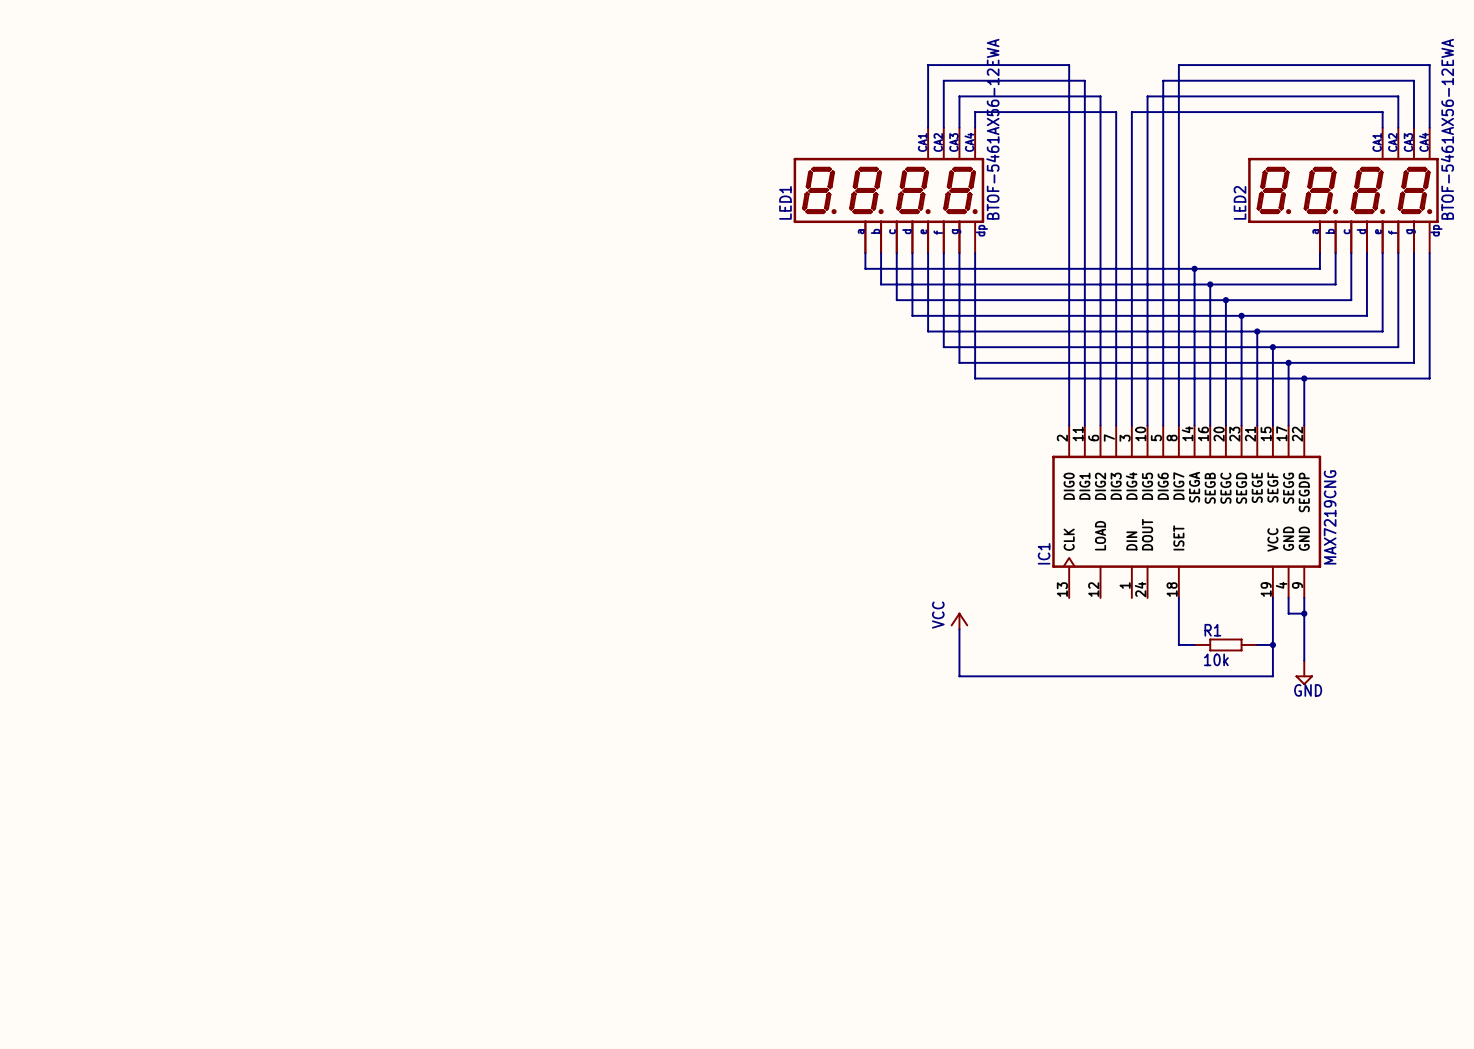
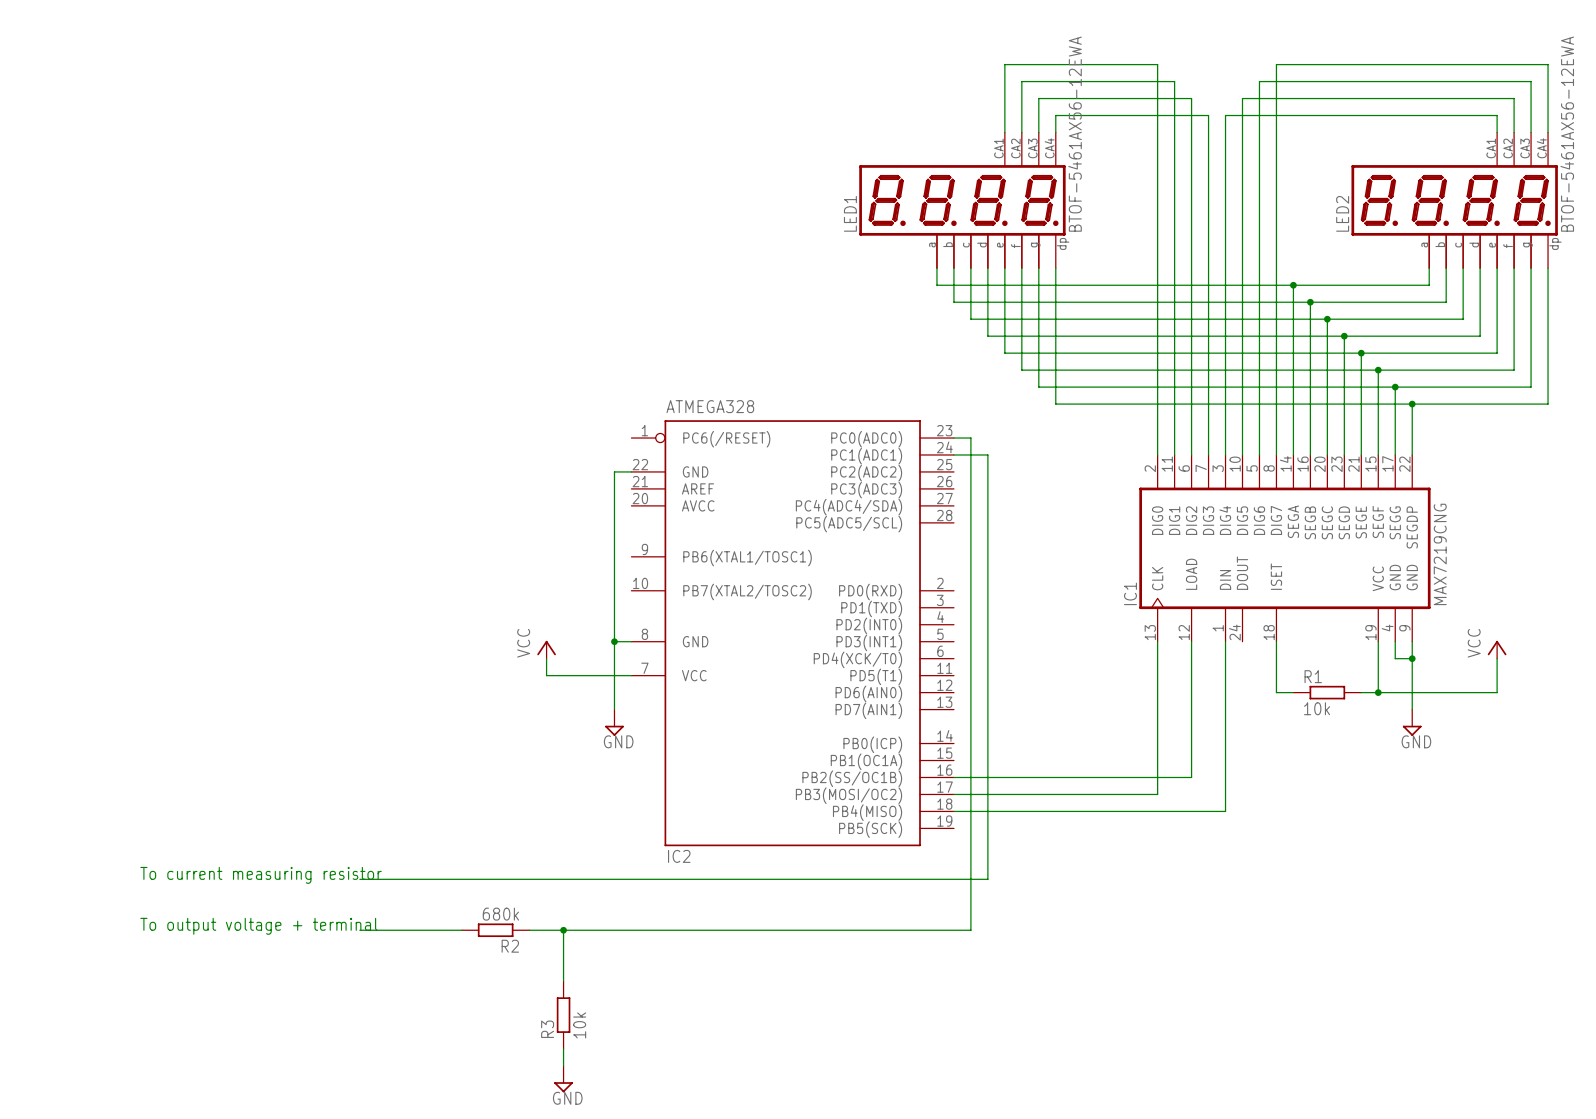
wire: none -> (953, 438) (970, 438) (970, 930) (529, 930)
wire: none -> (953, 454) (987, 454) (987, 879) (359, 879)
wire: none -> (631, 471) (614, 471) (614, 709)
IC2: none -> ATMEGA328 (792, 633)
wire: none -> (614, 641) (631, 641)
junction: none -> (614, 641)
wire: none -> (1157, 641) (1157, 794) (953, 794)
wire: none -> (1191, 641) (1191, 777) (953, 777)
wire: none -> (1225, 641) (1225, 811) (953, 811)
power symbol: none -> VCC (546, 649)
power symbol: none -> VCC (1497, 649)
wire: none -> (546, 658) (546, 675) (631, 675)
power symbol: VCC (959, 621) -> none
wire: (959, 629) (959, 676) (1272, 676) (1272, 644) -> (1497, 658) (1497, 692) (1378, 692)
power symbol: none -> GND (614, 722)
text: none -> To current measuring resistor (261, 875)
text: none -> To output voltage + terminal (258, 926)
wire: none -> (359, 930) (461, 930)
R2: none -> 680k (495, 930)
wire: none -> (563, 930) (563, 981)
junction: none -> (563, 930)
R3: none -> 10k (563, 1015)
wire: none -> (563, 1049) (563, 1066)
power symbol: none -> GND (563, 1079)

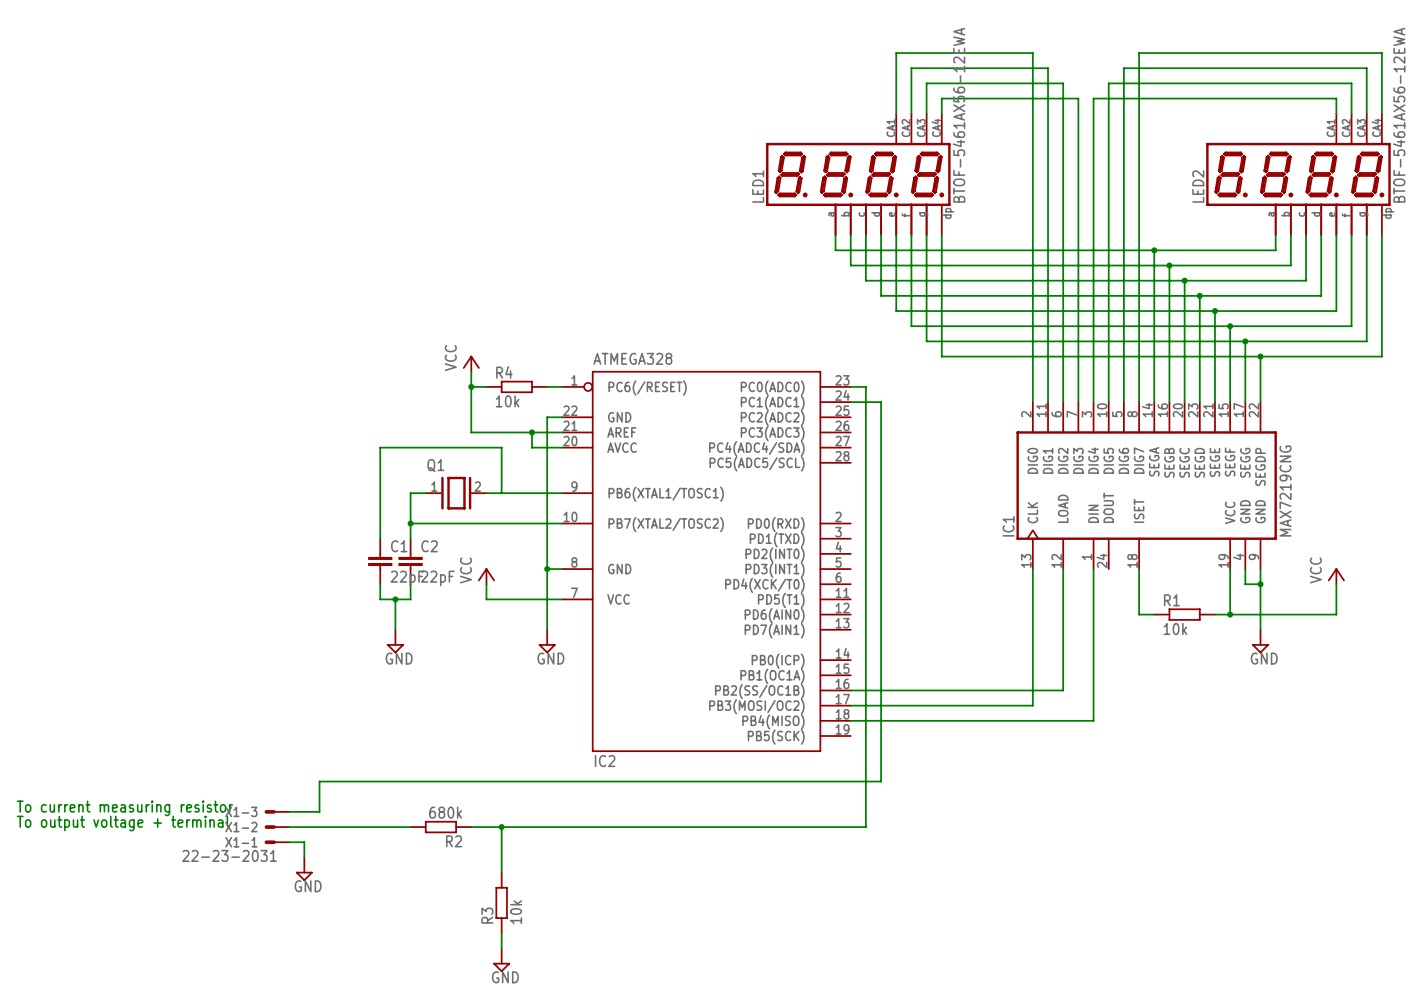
power symbol: none -> VCC (471, 363)
wire: none -> (471, 371) (471, 432) (562, 432)
wire: none -> (471, 386) (486, 386)
junction: none -> (471, 386)
R4: none -> 10k (516, 386)
wire: none -> (547, 386) (562, 386)
wire: none -> (532, 432) (532, 447) (562, 447)
junction: none -> (532, 432)
wire: none -> (425, 493) (410, 493) (410, 538)
Q1: none -> (456, 493)
wire: none -> (486, 493) (562, 493)
wire: none -> (501, 493) (501, 447) (380, 447) (380, 538)
wire: none -> (410, 523) (562, 523)
junction: none -> (410, 523)
C1: none -> 22pF (380, 561)
C2: none -> 22pF (410, 561)
wire: none -> (380, 584) (380, 599) (410, 599) (410, 584)
wire: none -> (395, 599) (395, 629)
junction: none -> (395, 599)
power symbol: none -> GND (395, 641)
text position: To current measuring resistor (261, 875) -> To current measuring resistor (124, 808)
wire: none -> (319, 781) (319, 811) (289, 811)
X1-3: none -> (276, 811)
text position: To output voltage + terminal (258, 926) -> To output voltage + terminal (123, 823)
X1-2: none -> (276, 827)
wire: none -> (289, 827) (319, 827)
X1-1: none -> 22-23-2031 (276, 842)
wire: none -> (289, 842) (304, 842) (304, 857)
power symbol: none -> GND (304, 869)

